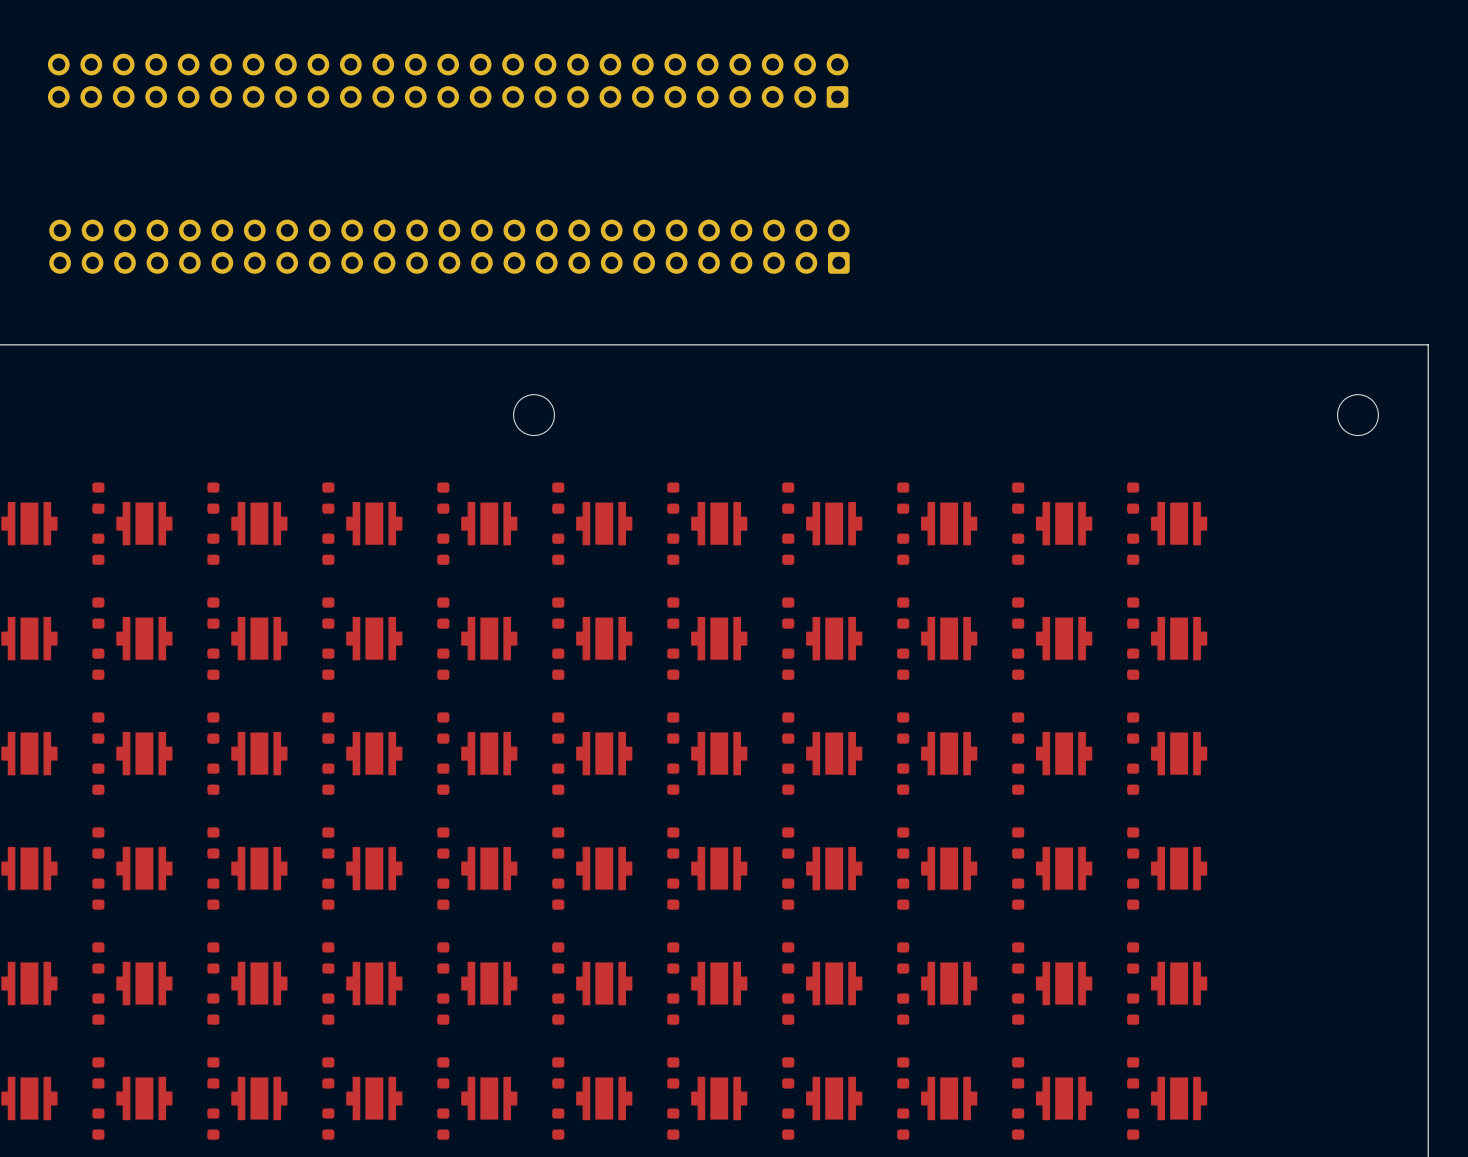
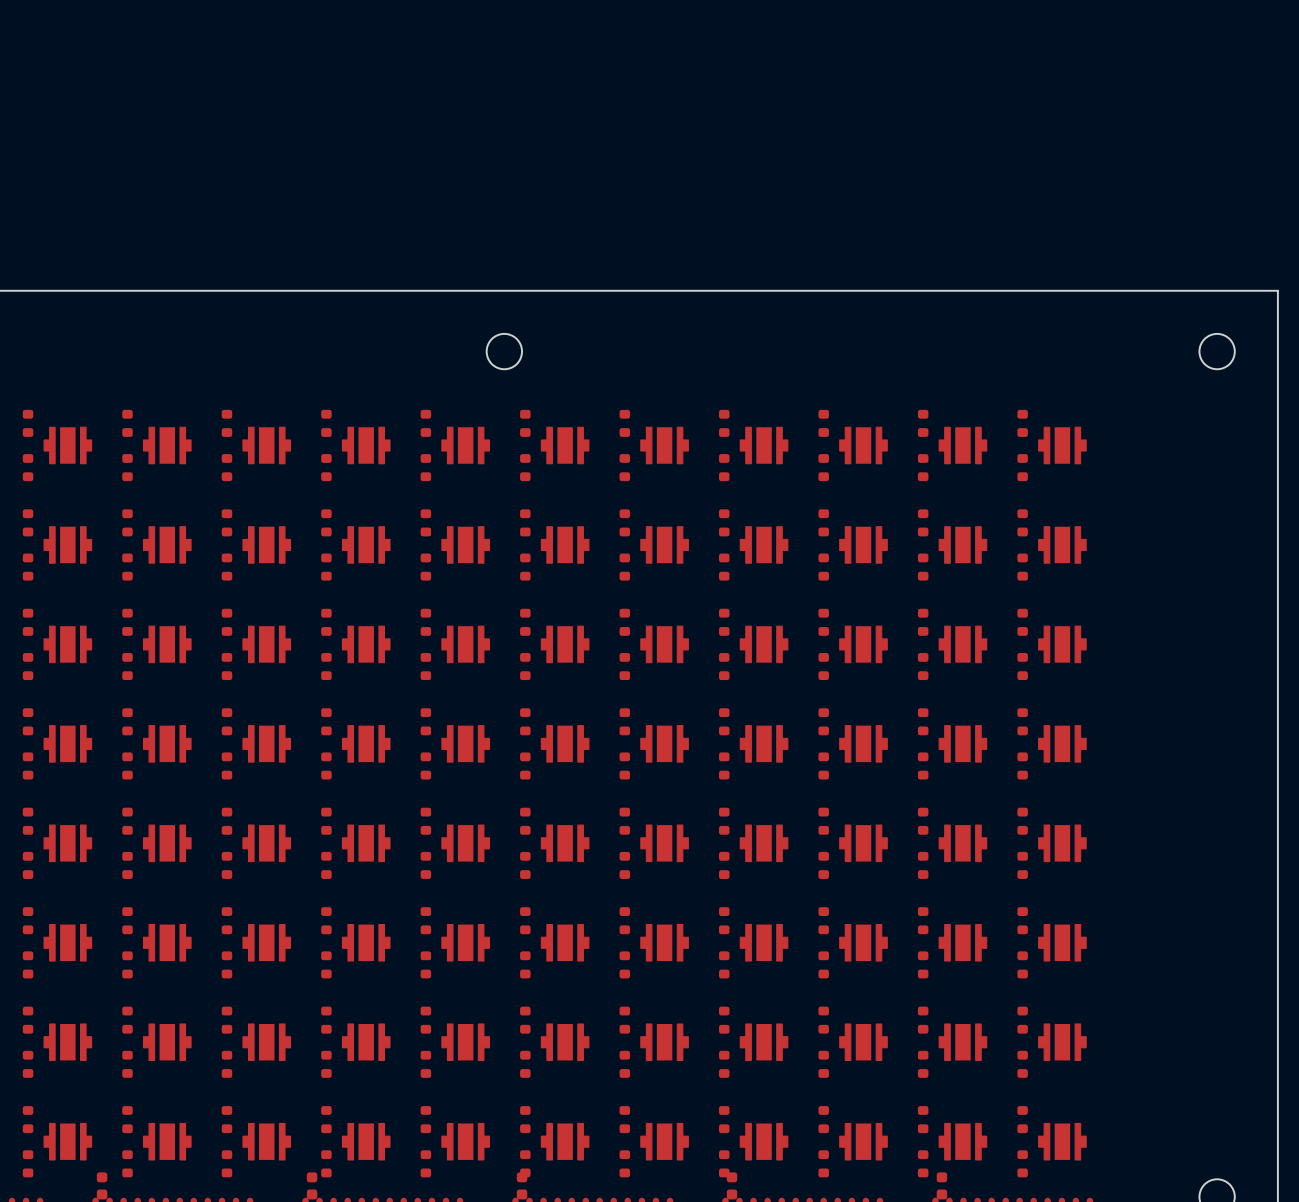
part: (448, 80) -> none
part: (449, 246) -> none

